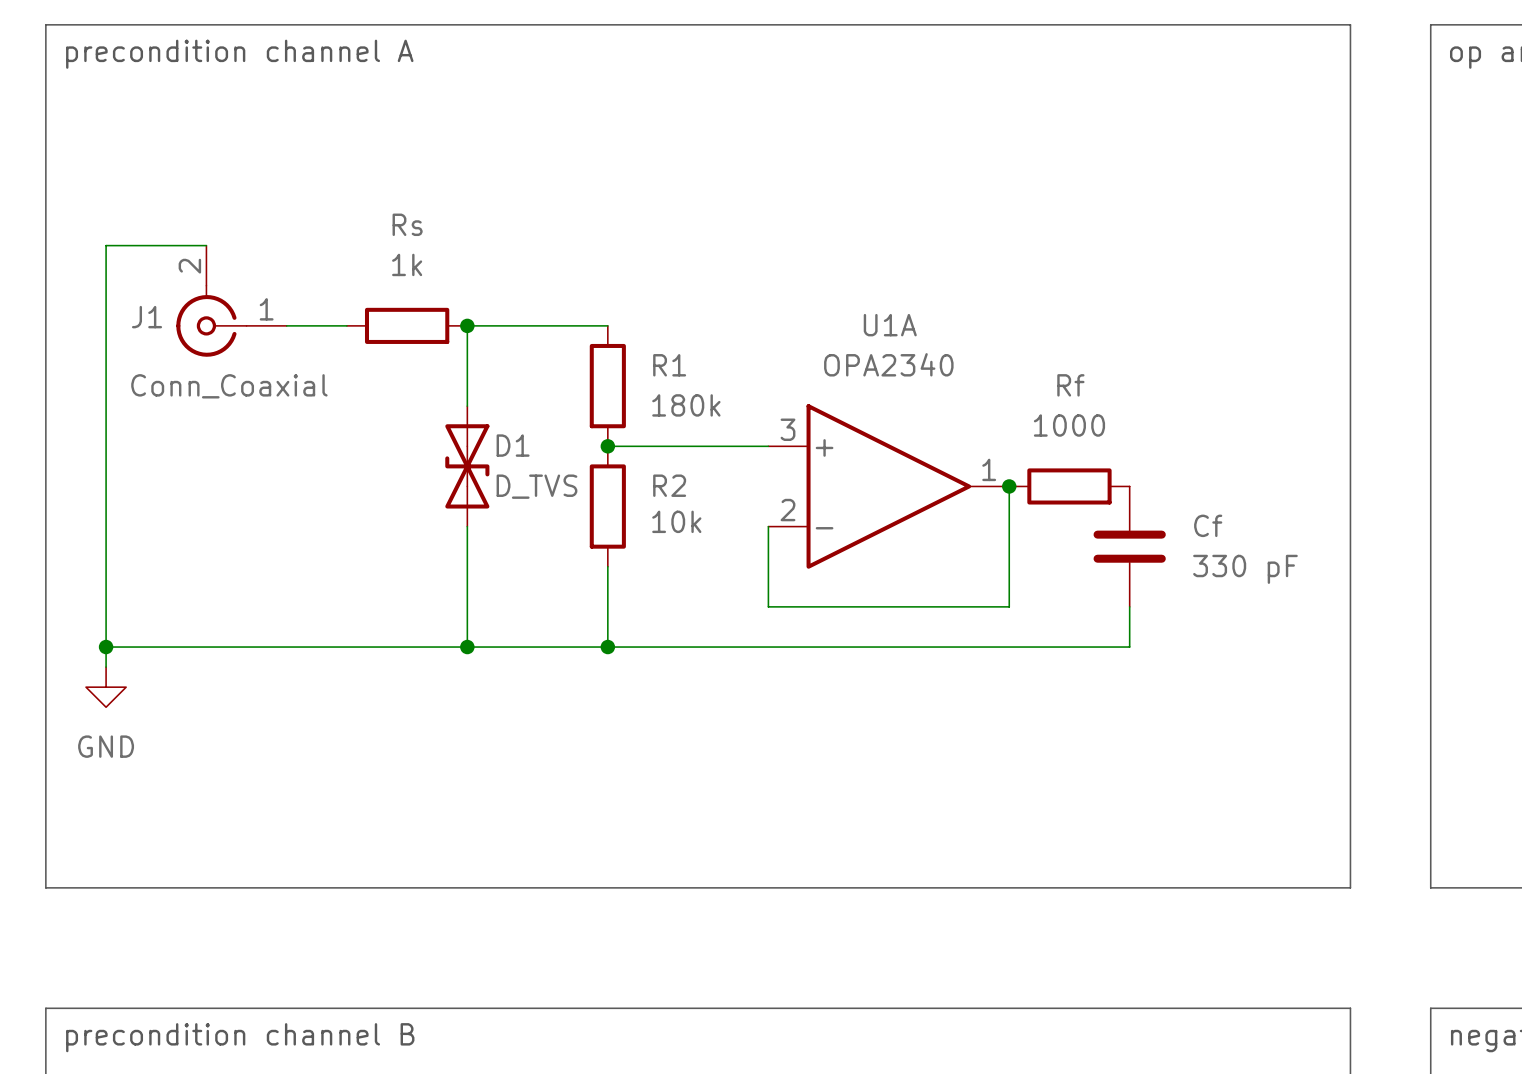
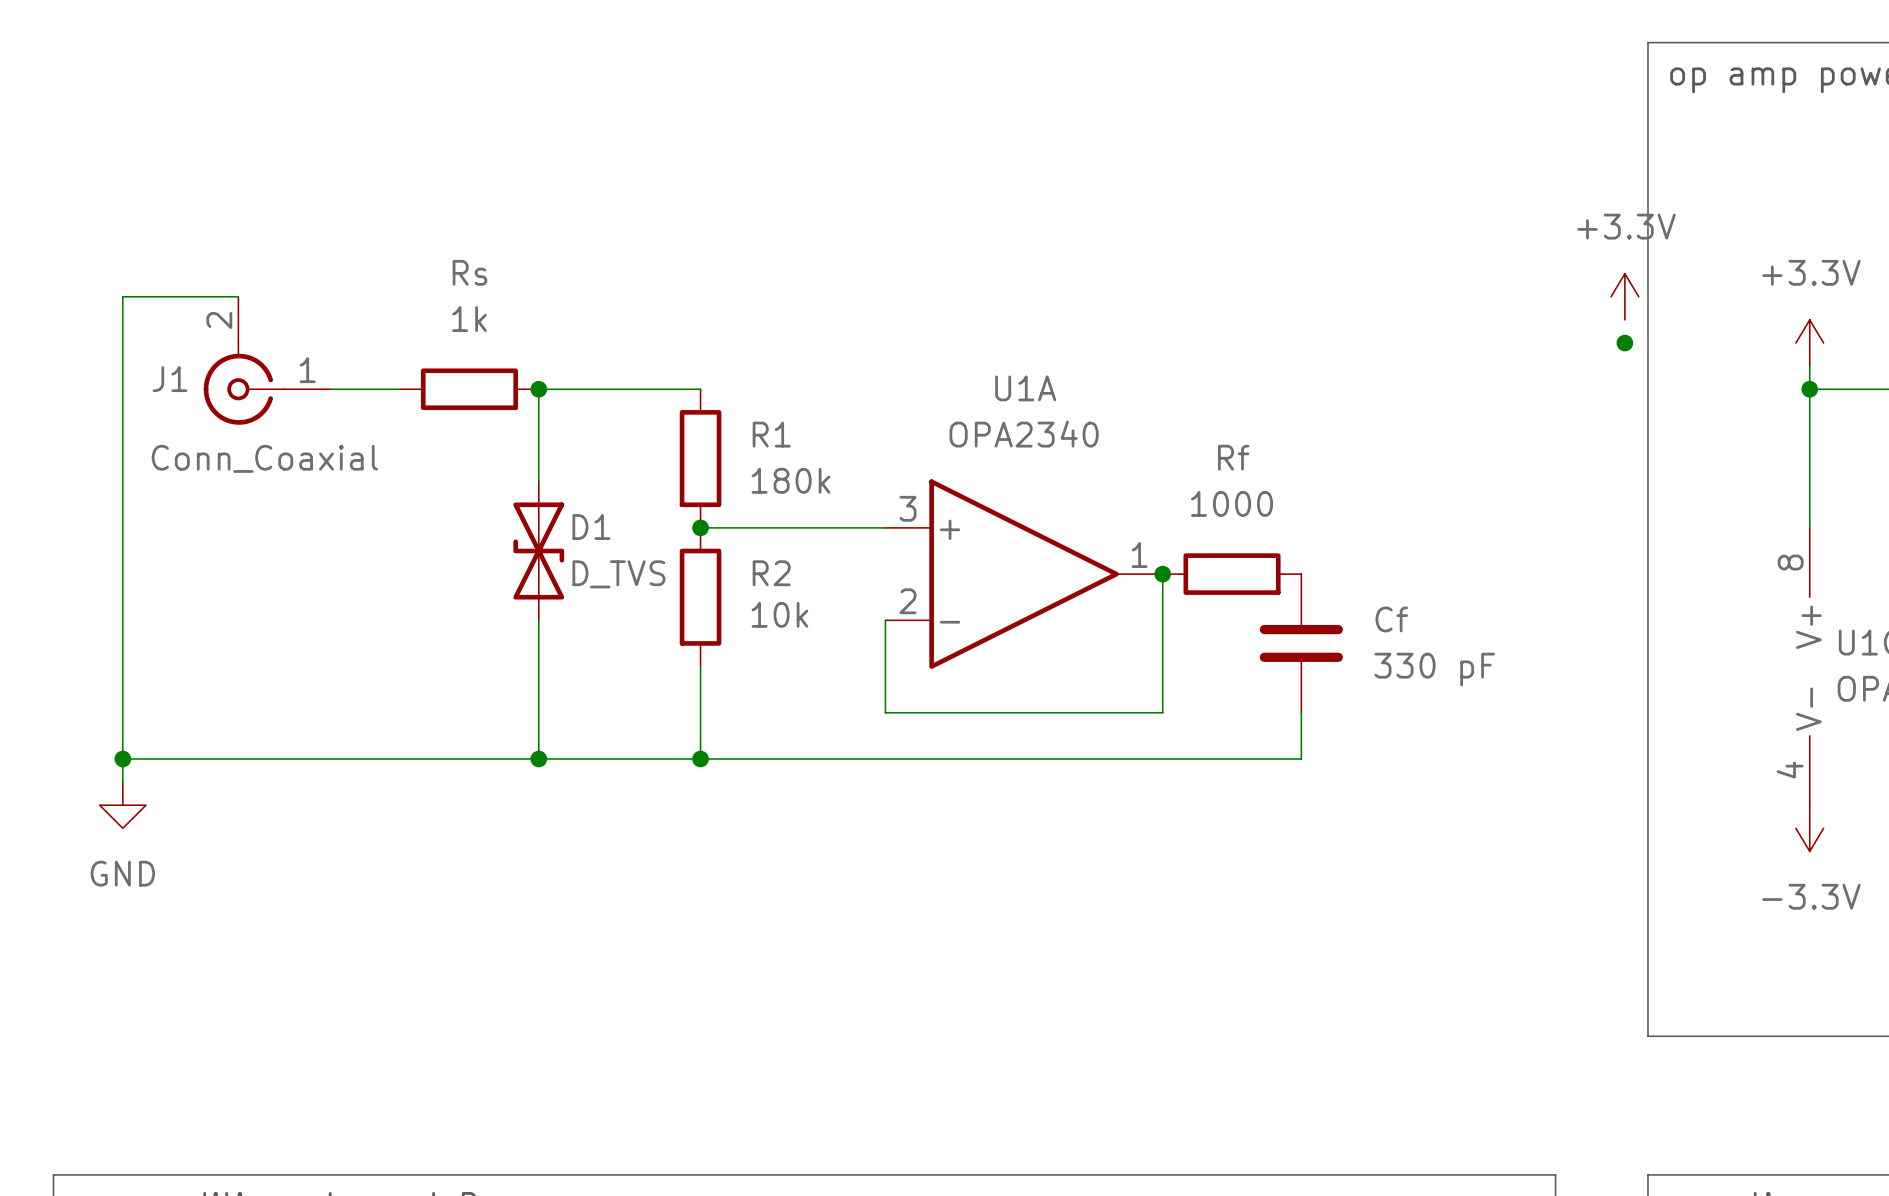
line: (45, 24) (45, 887) (1350, 887) (1350, 24) (45, 24) -> none
text: precondition channel A (239, 54) -> none
power symbol: none -> +3.3V (1624, 296)
junction: none -> (1624, 343)

